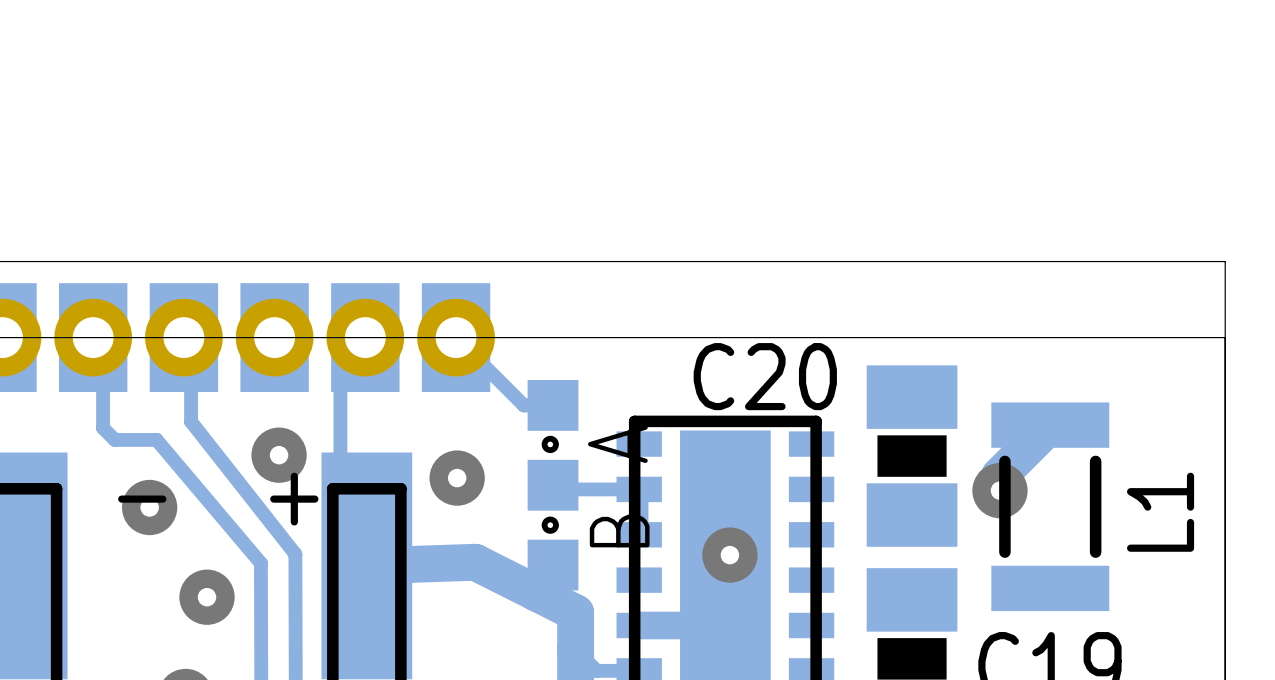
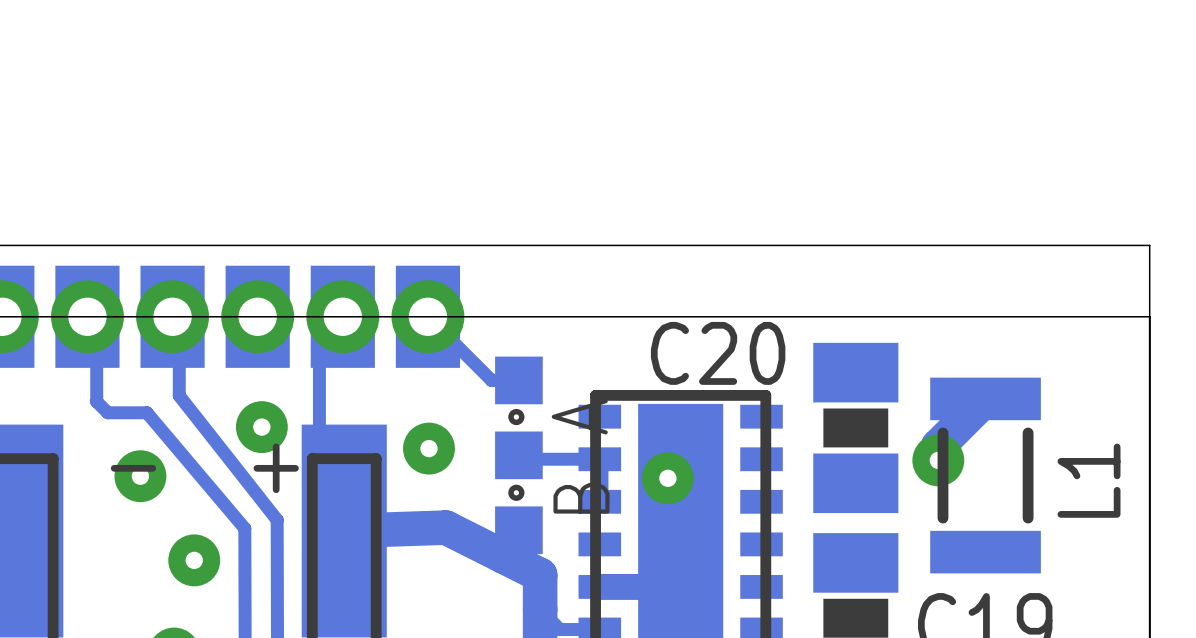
via position: (729, 555) -> (667, 478)

